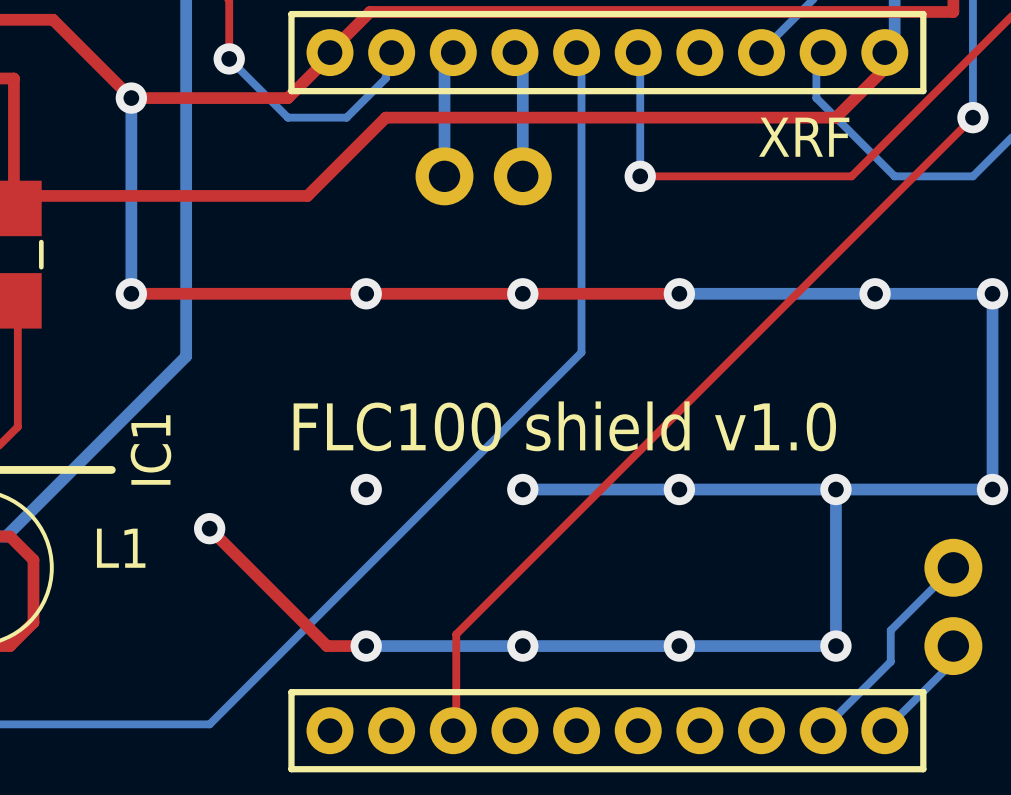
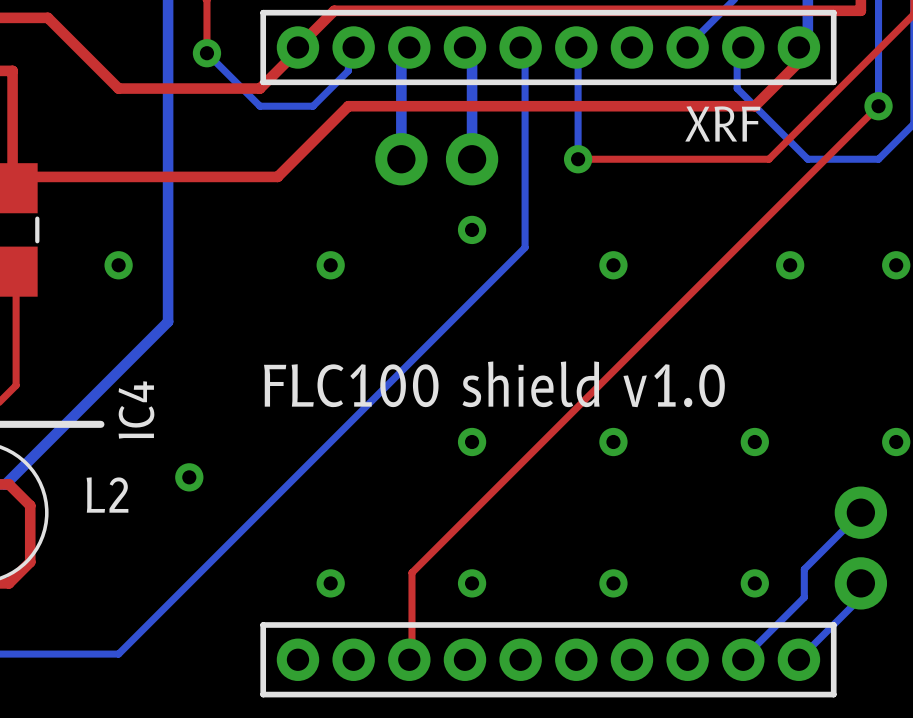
bottom track: (131, 98) (131, 293) -> none
via: (131, 98) -> none
bottom track: (581, 274) (581, 352) (209, 724) (131, 724) -> (525, 247) (118, 654)
top track: (131, 293) (679, 293) -> none
via position: (522, 293) -> (472, 229)
bottom track: (679, 293) (992, 293) (992, 489) (522, 489) -> none
IC1 name: IC1 (150, 450) -> IC4 (136, 409)
via: (366, 489) -> none
bottom track: (835, 489) (835, 646) (366, 646) -> none
top track: (209, 528) (327, 646) (366, 646) -> none
L1 name: L1 (121, 548) -> L2 (107, 495)

